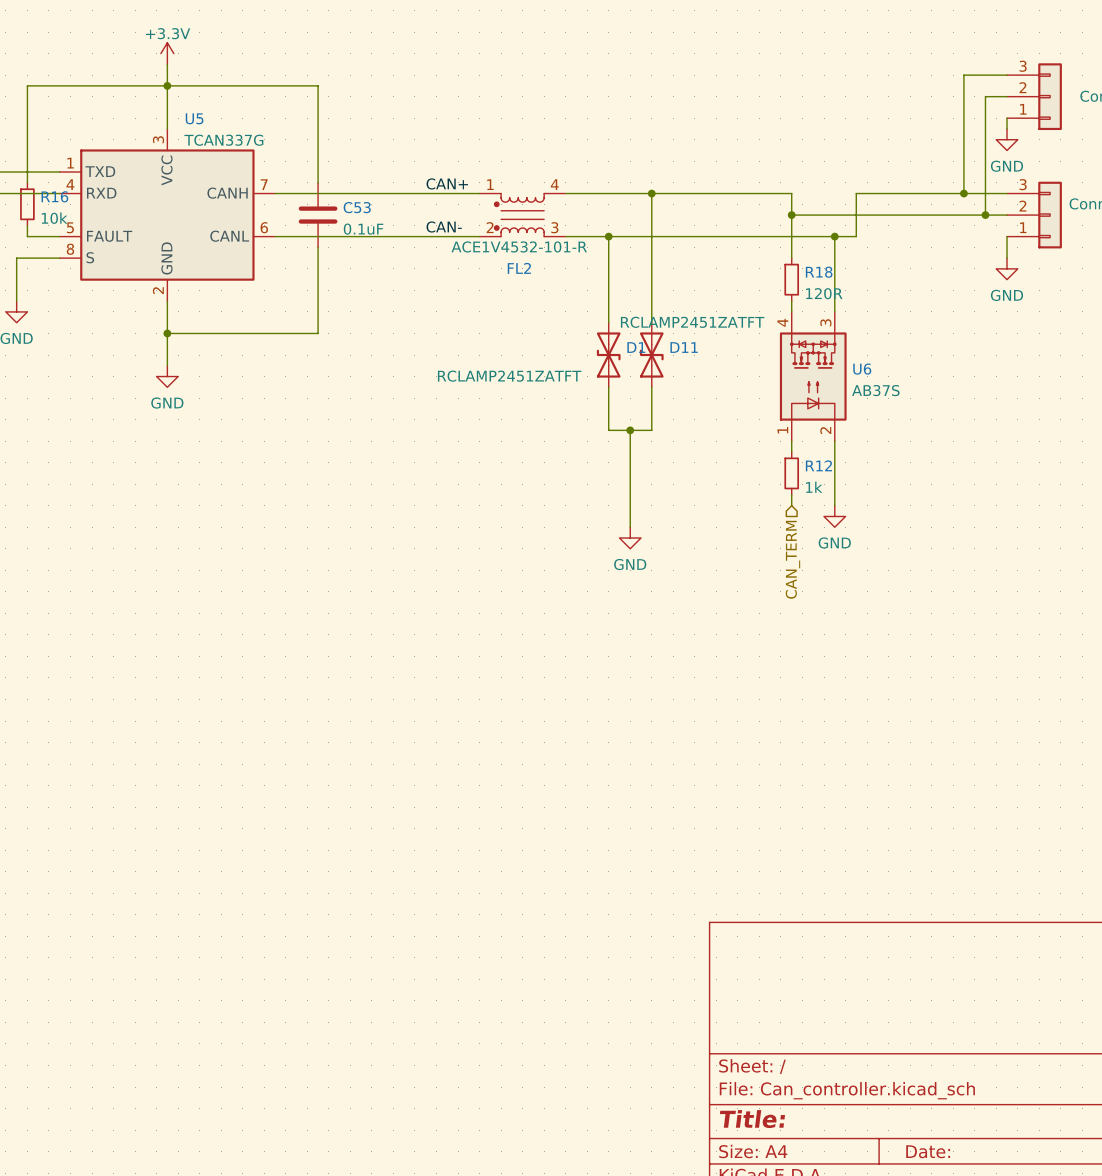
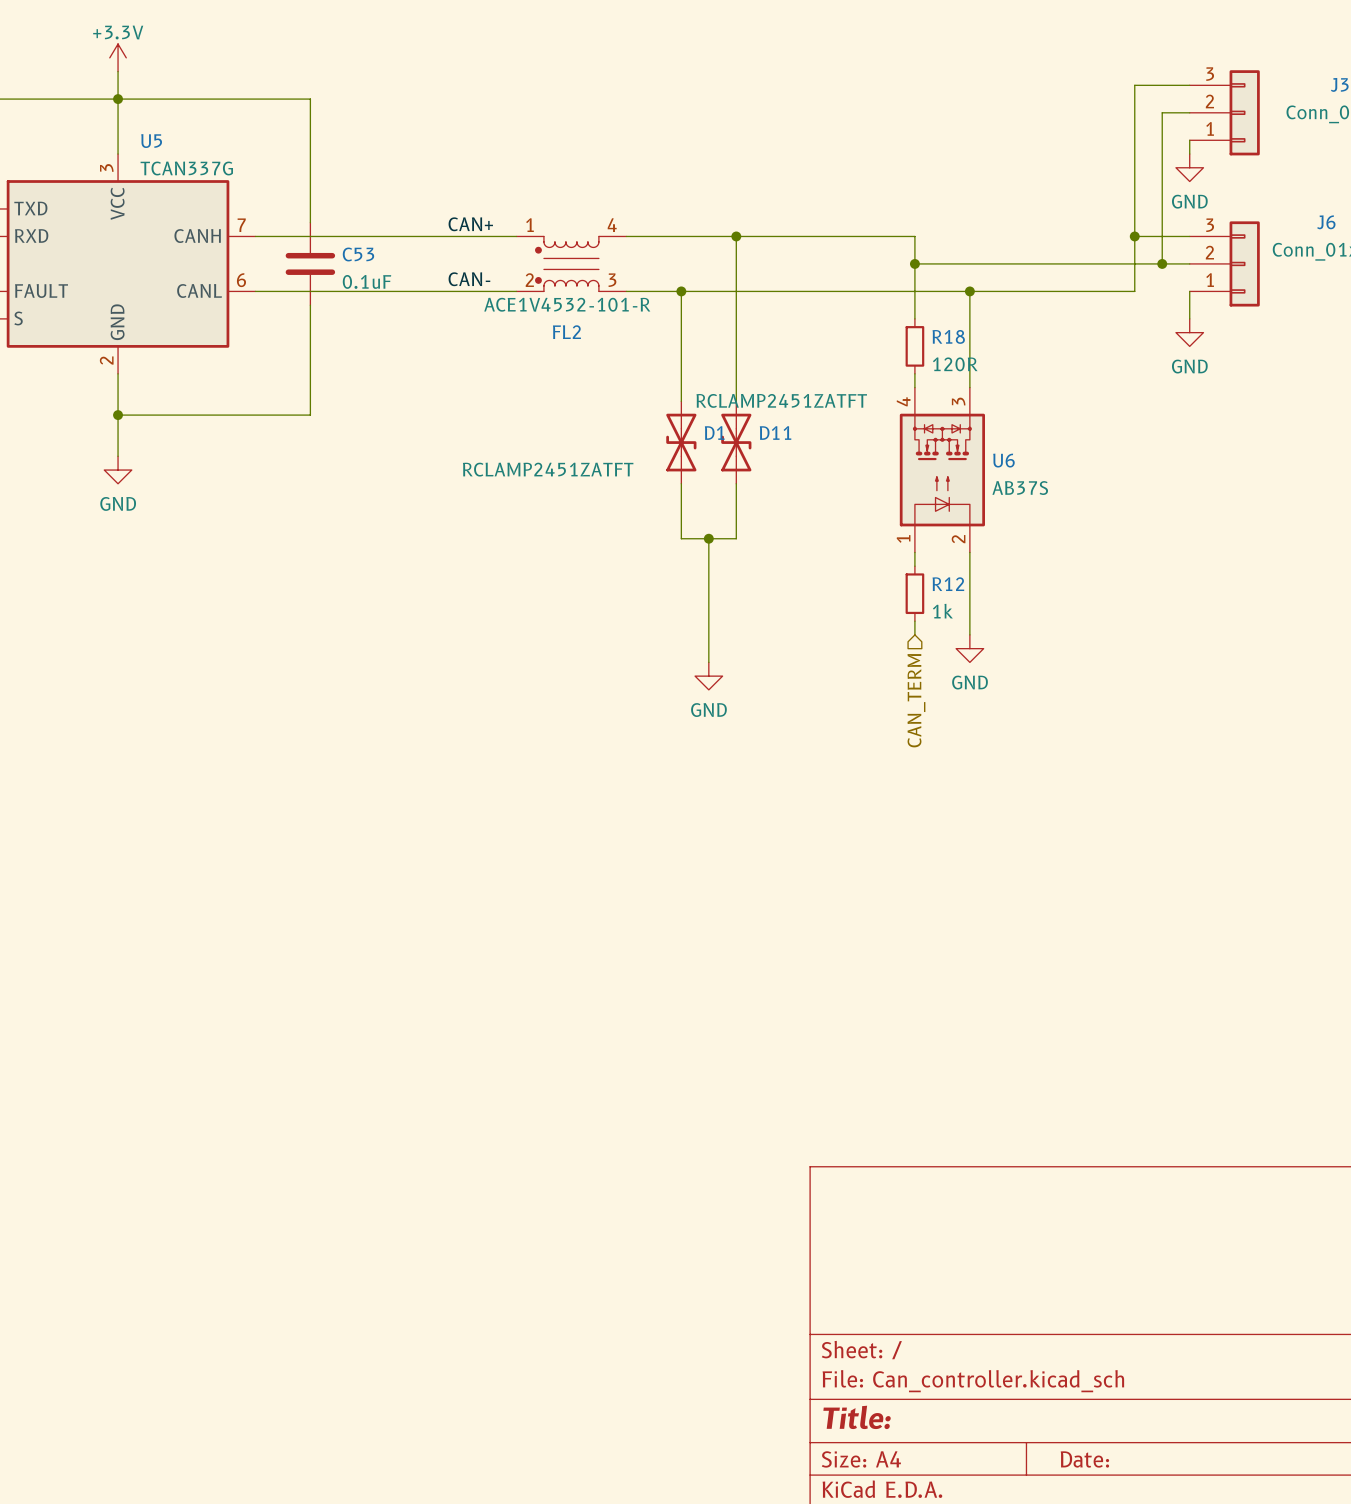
wire: (963, 193) (856, 193) (856, 236) -> (1134, 236) (1134, 291) (997, 291)

